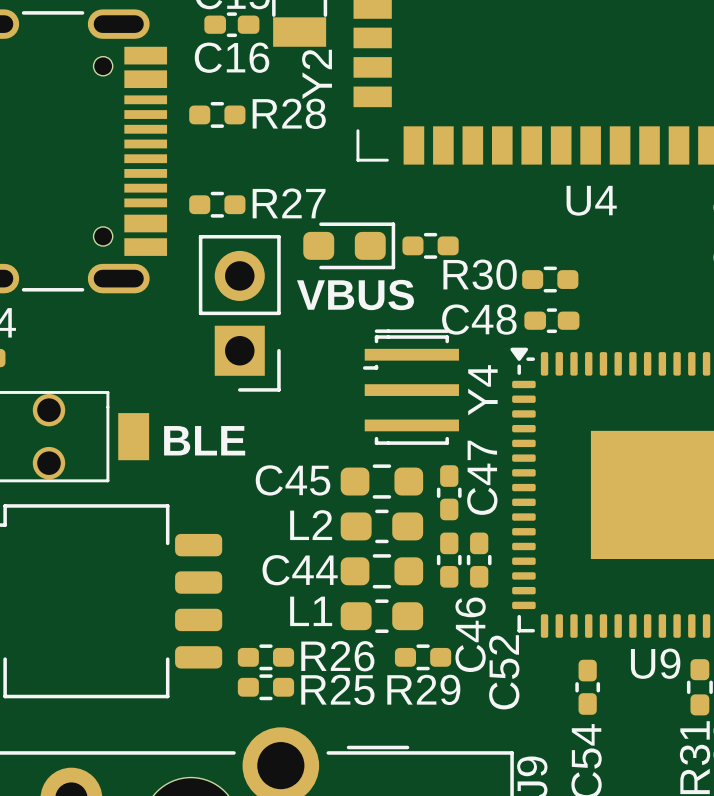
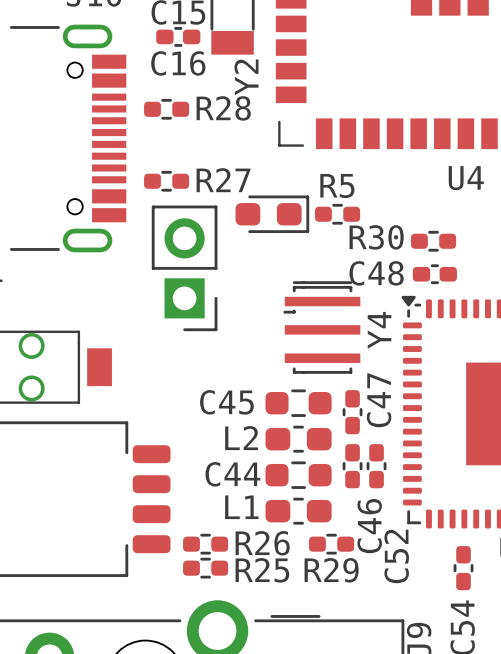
R5 name: none -> R5 (337, 185)
text: VBUS (355, 295) -> none
text: BLE (204, 440) -> none

